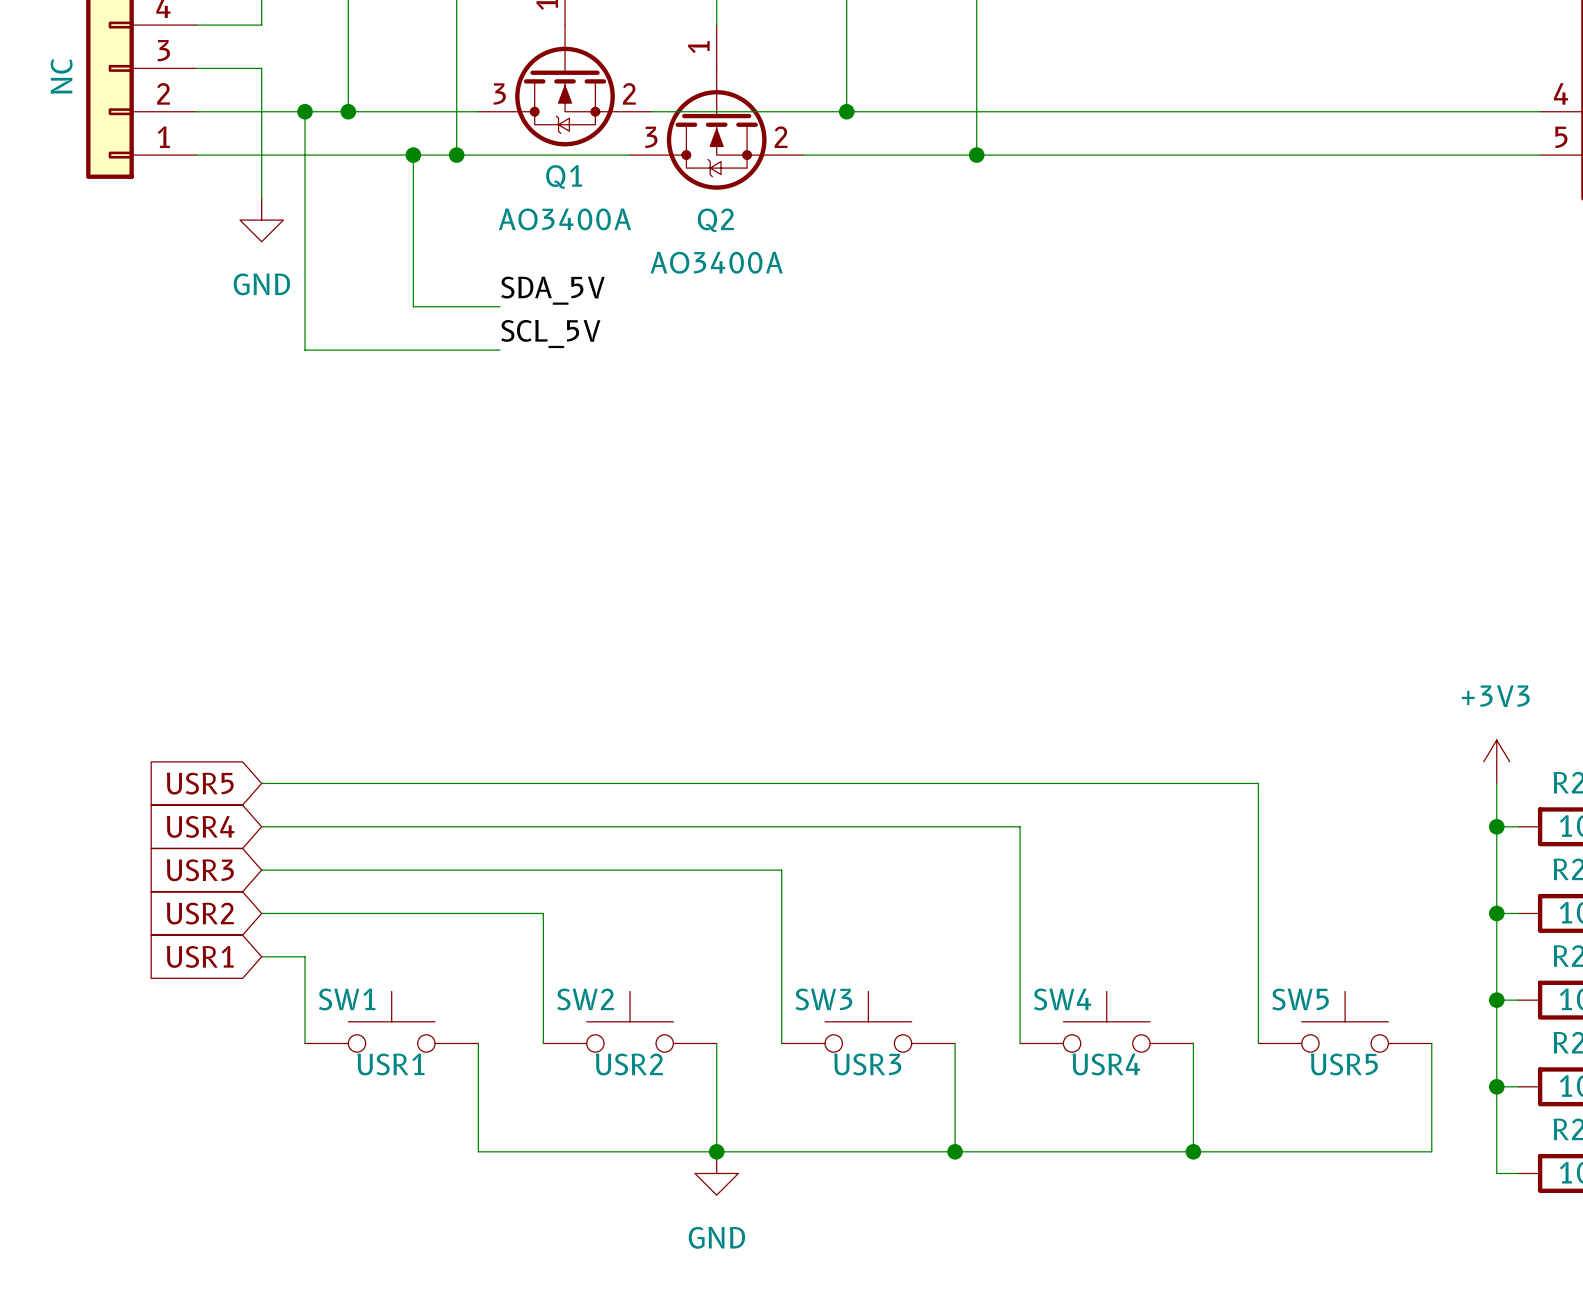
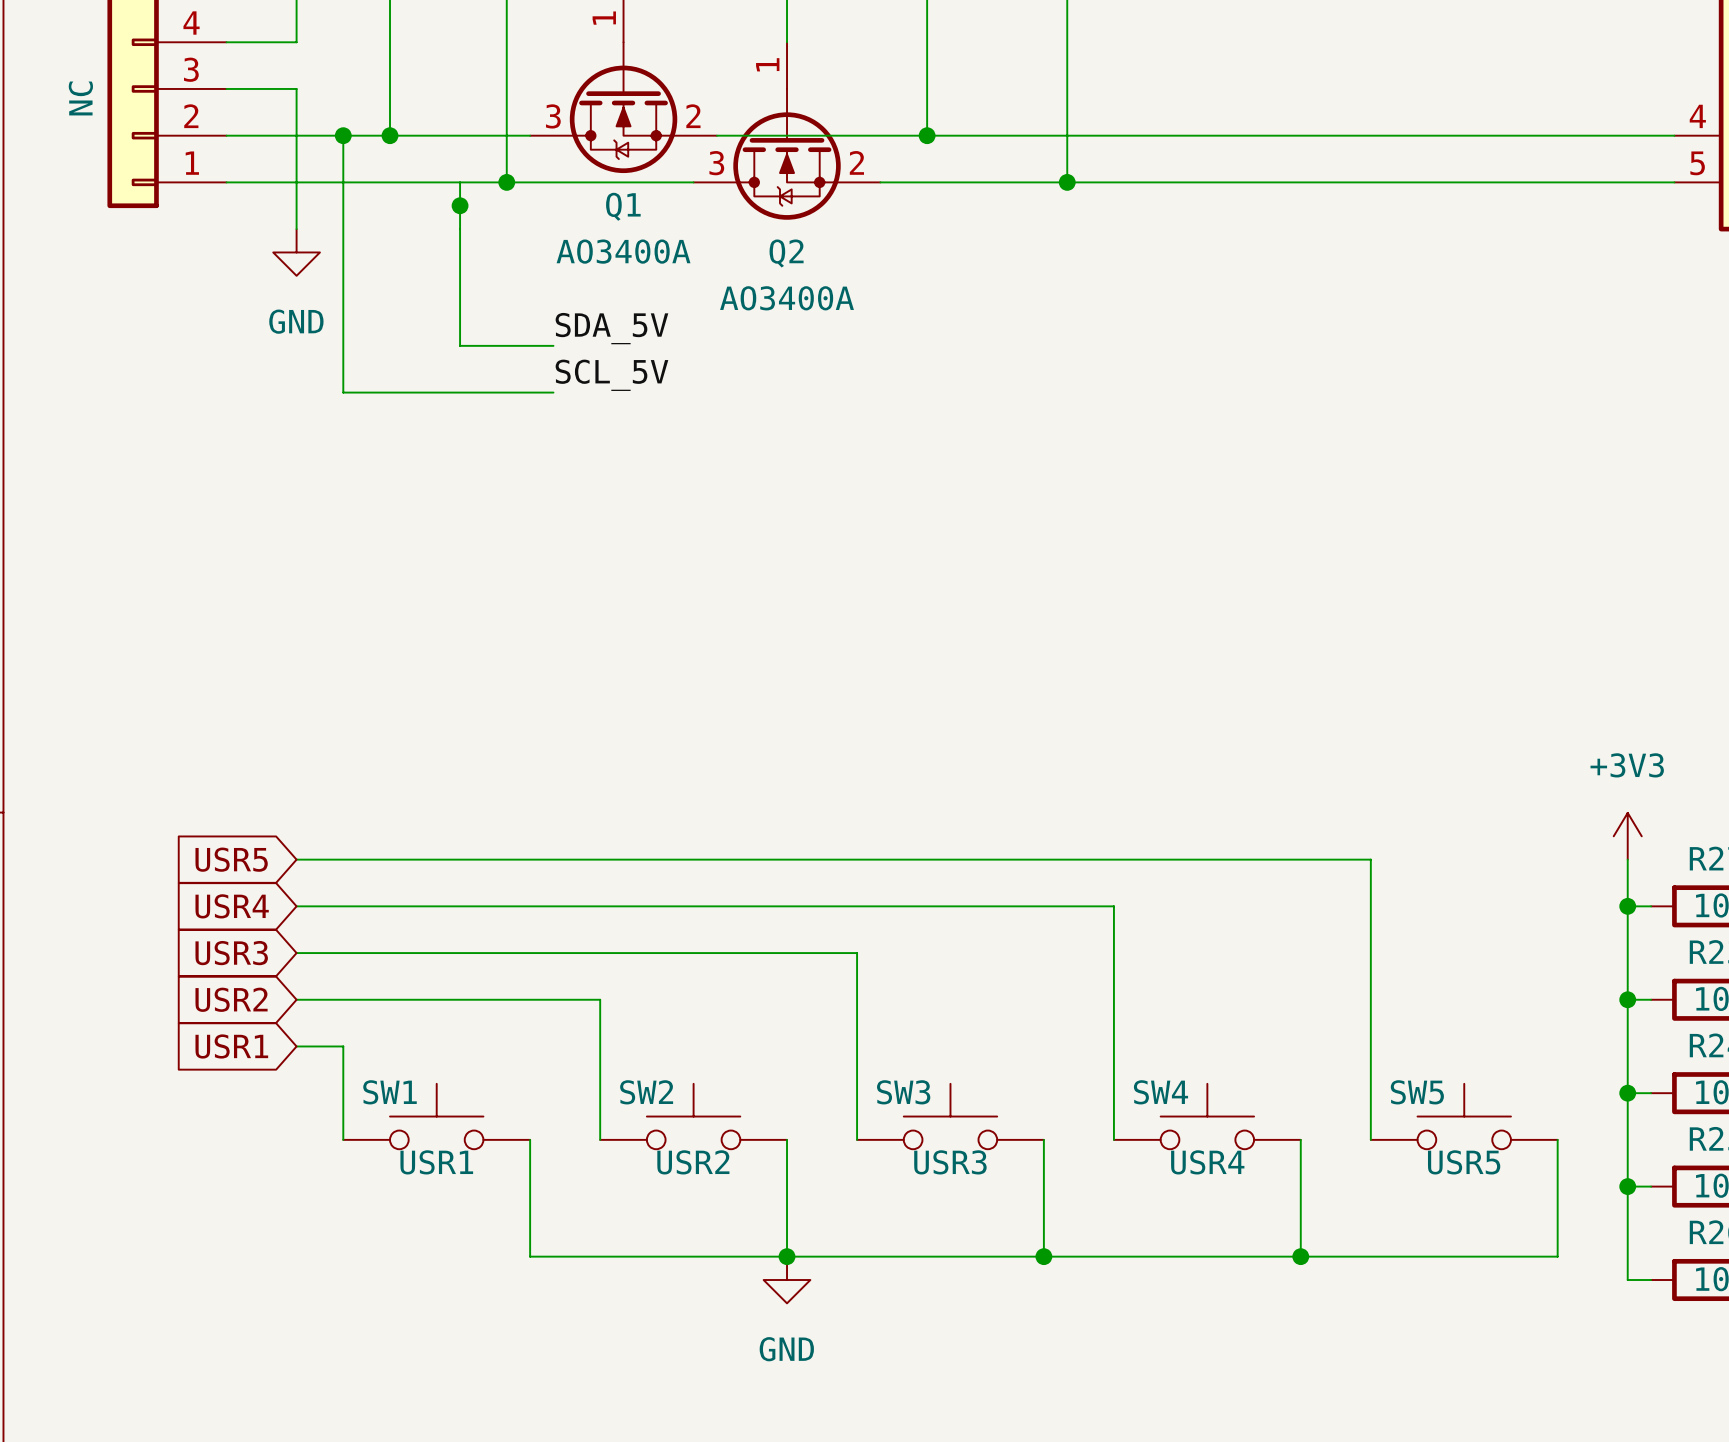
junction position: (413, 155) -> (460, 205)

